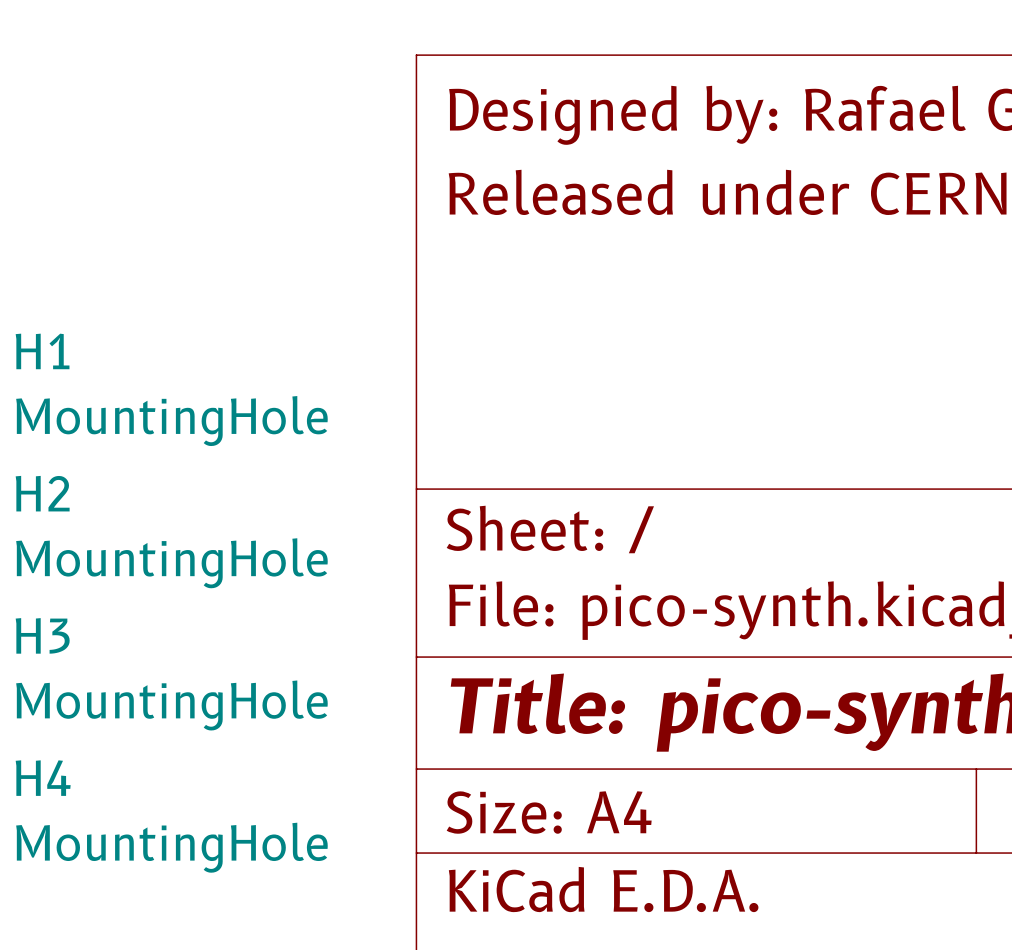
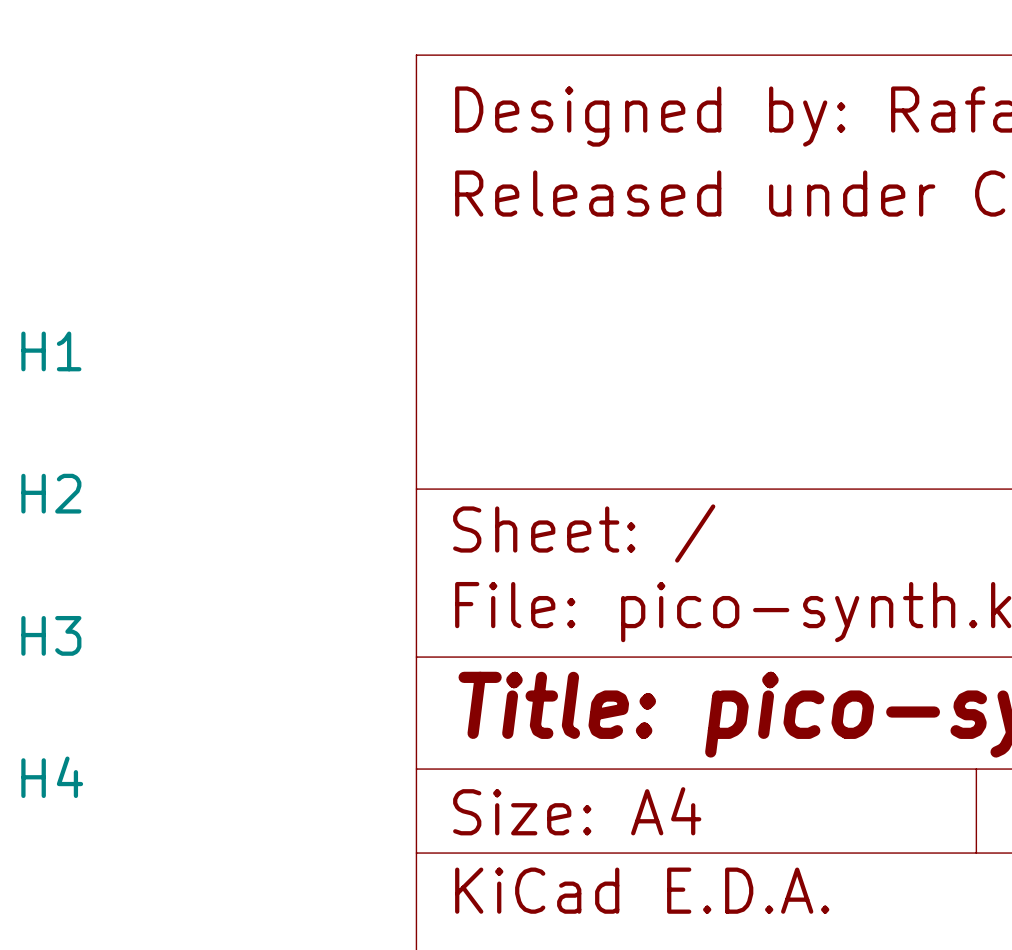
H1 value: MountingHole (171, 421) -> none
H2 value: MountingHole (171, 563) -> none
H3 value: MountingHole (171, 705) -> none
H4 value: MountingHole (171, 847) -> none

